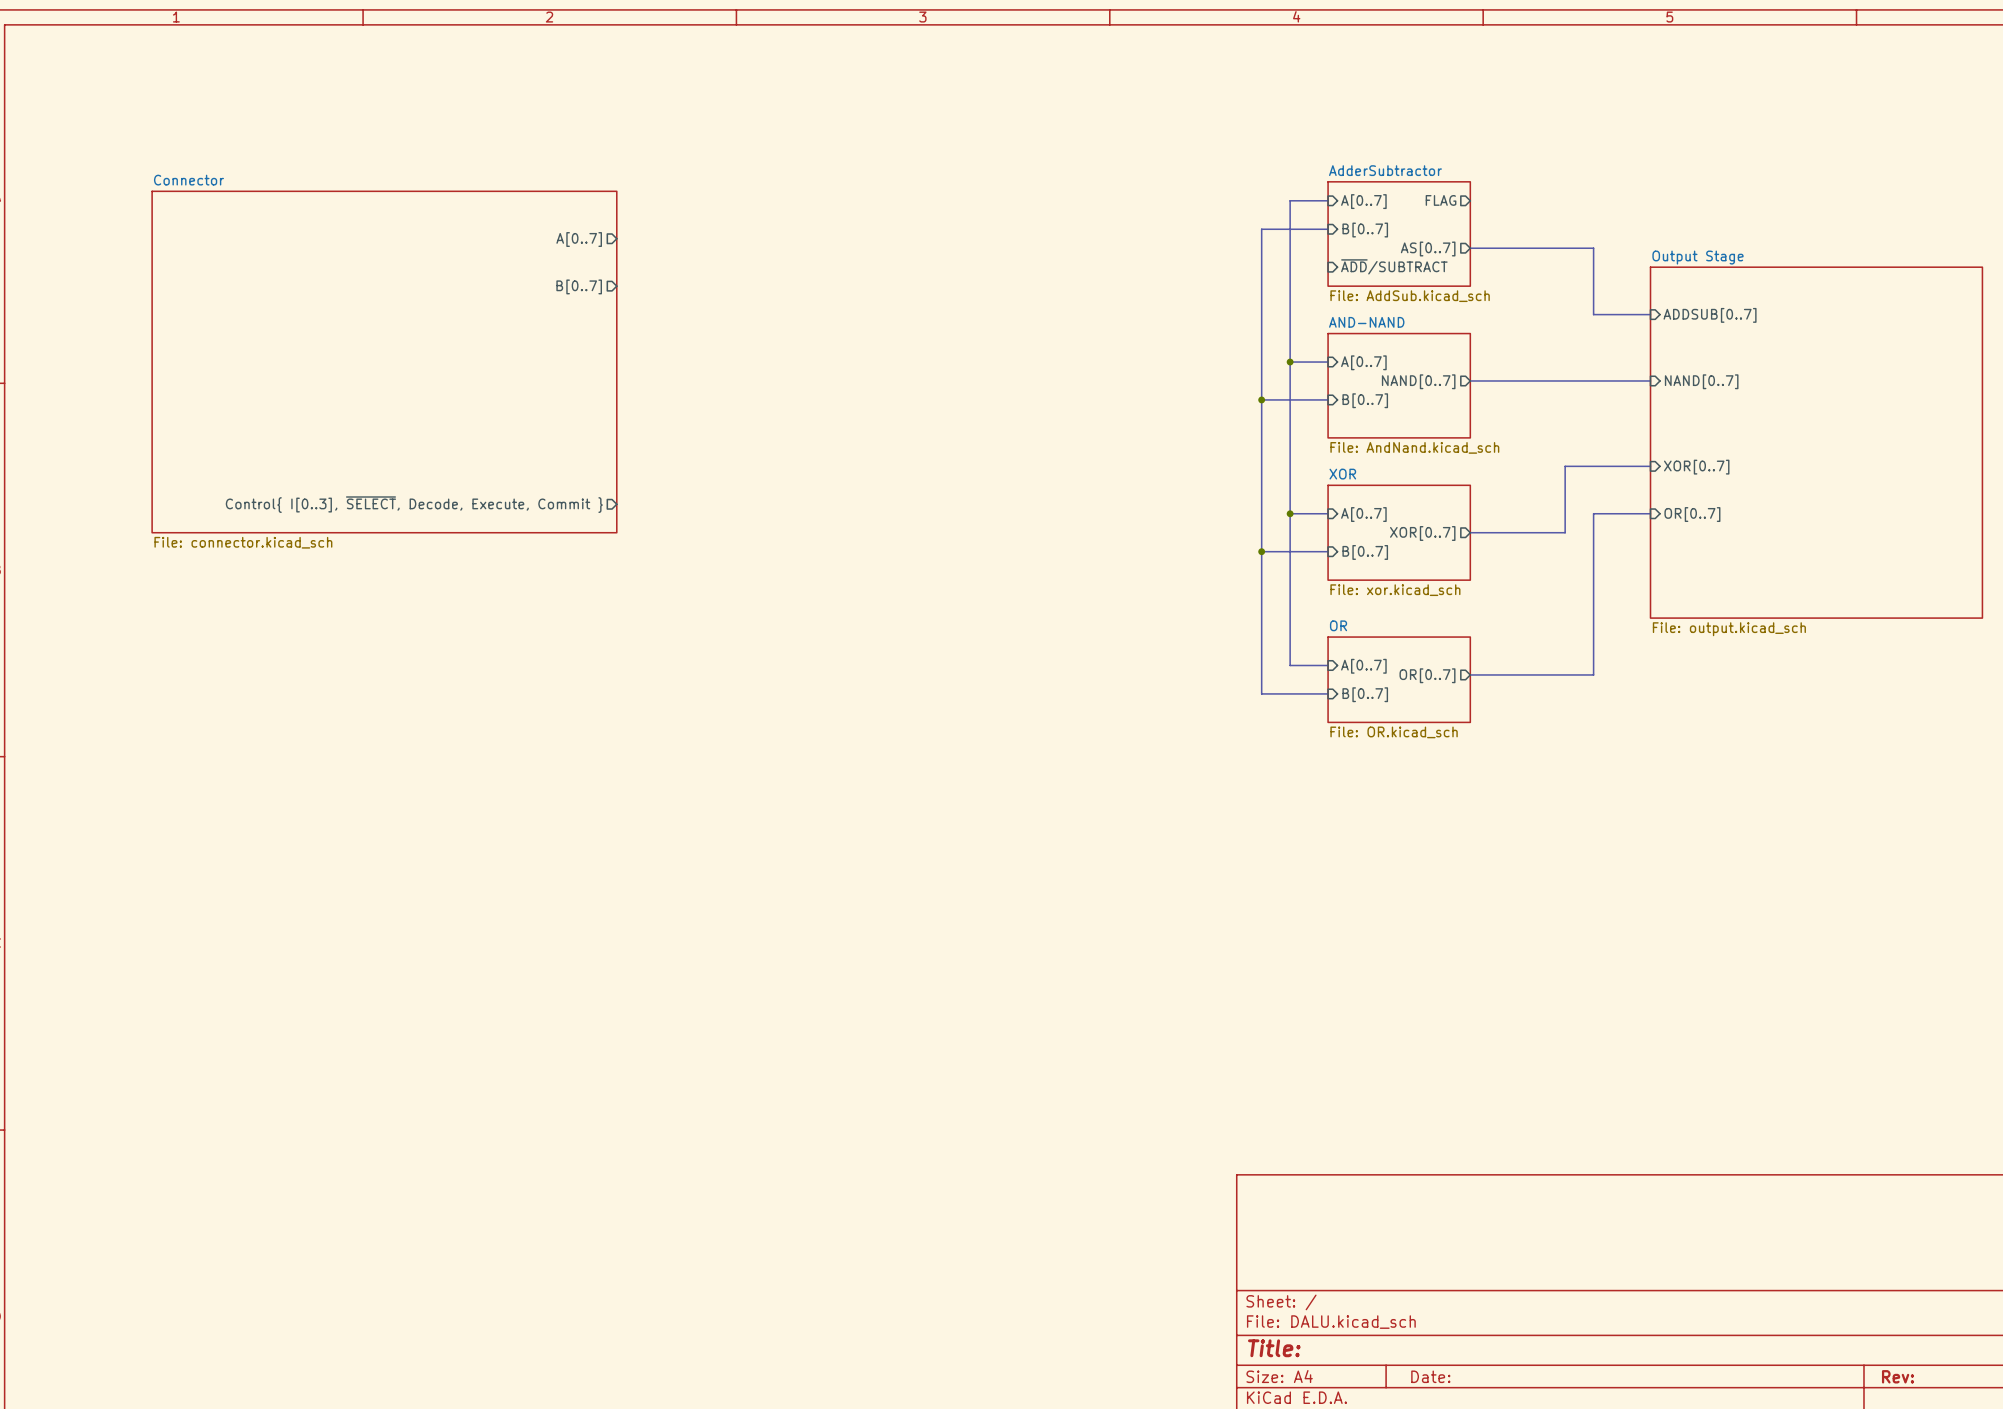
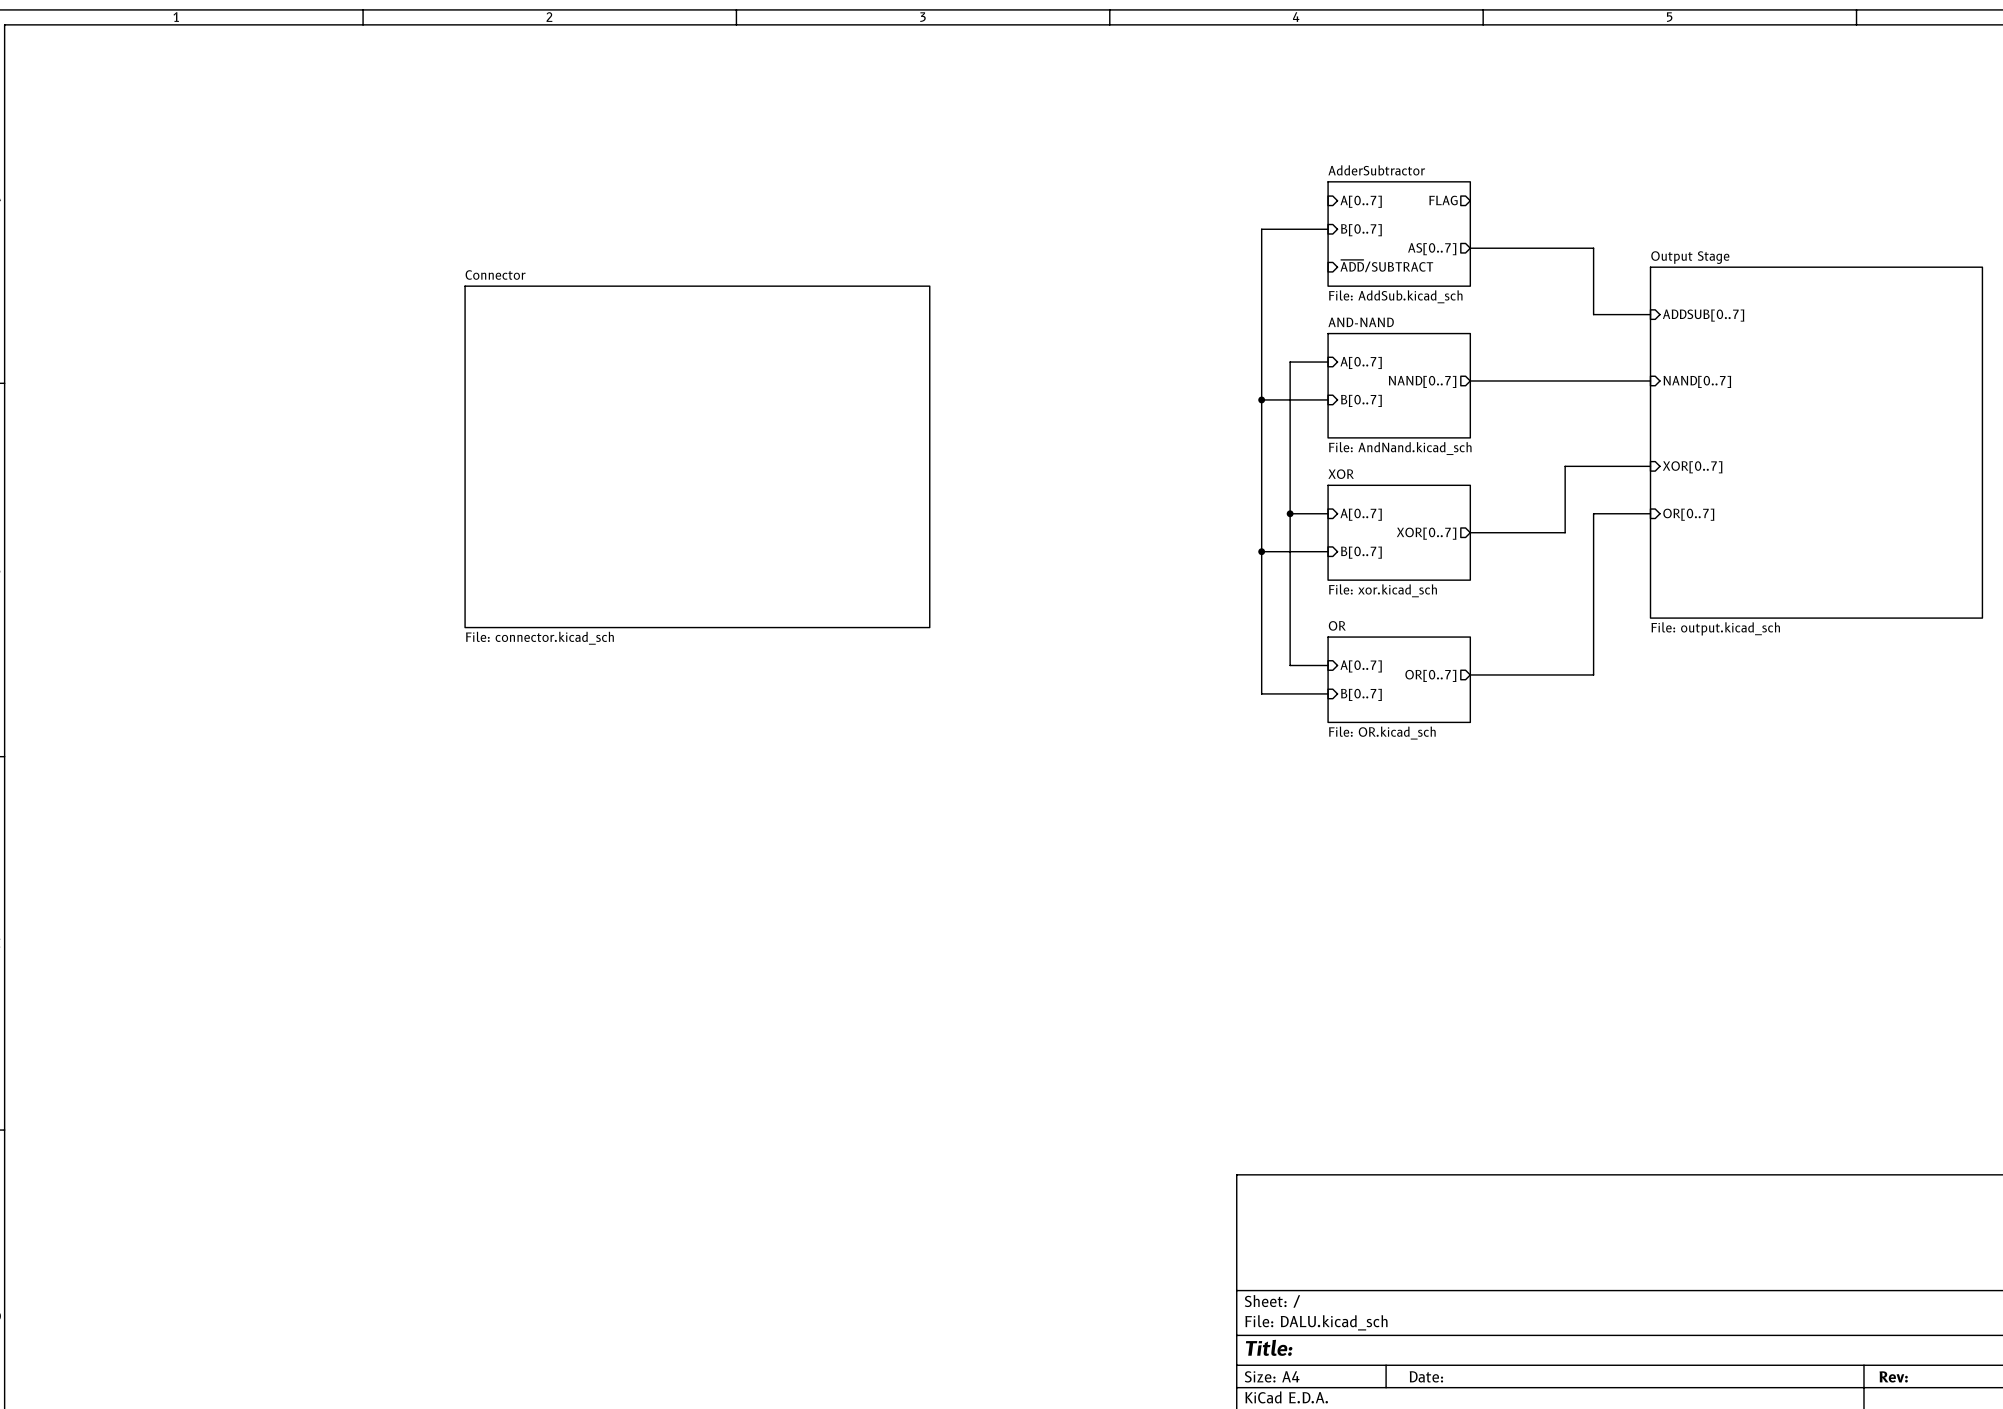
bus: (1328, 200) (1290, 200) (1290, 362) -> none
sheet pin: A[0..7] (579, 239) -> none
sheet pin: B[0..7] (579, 286) -> none
sheet Connector: File: connector.kicad_sch (384, 362) -> none
junction: (1290, 362) -> none
sheet Connector: none -> File: connector.kicad_sch (697, 456)
sheet pin: Control{ I[0..3], ~{SELECT}, Decode, Execute, Commit } (414, 504) -> none

